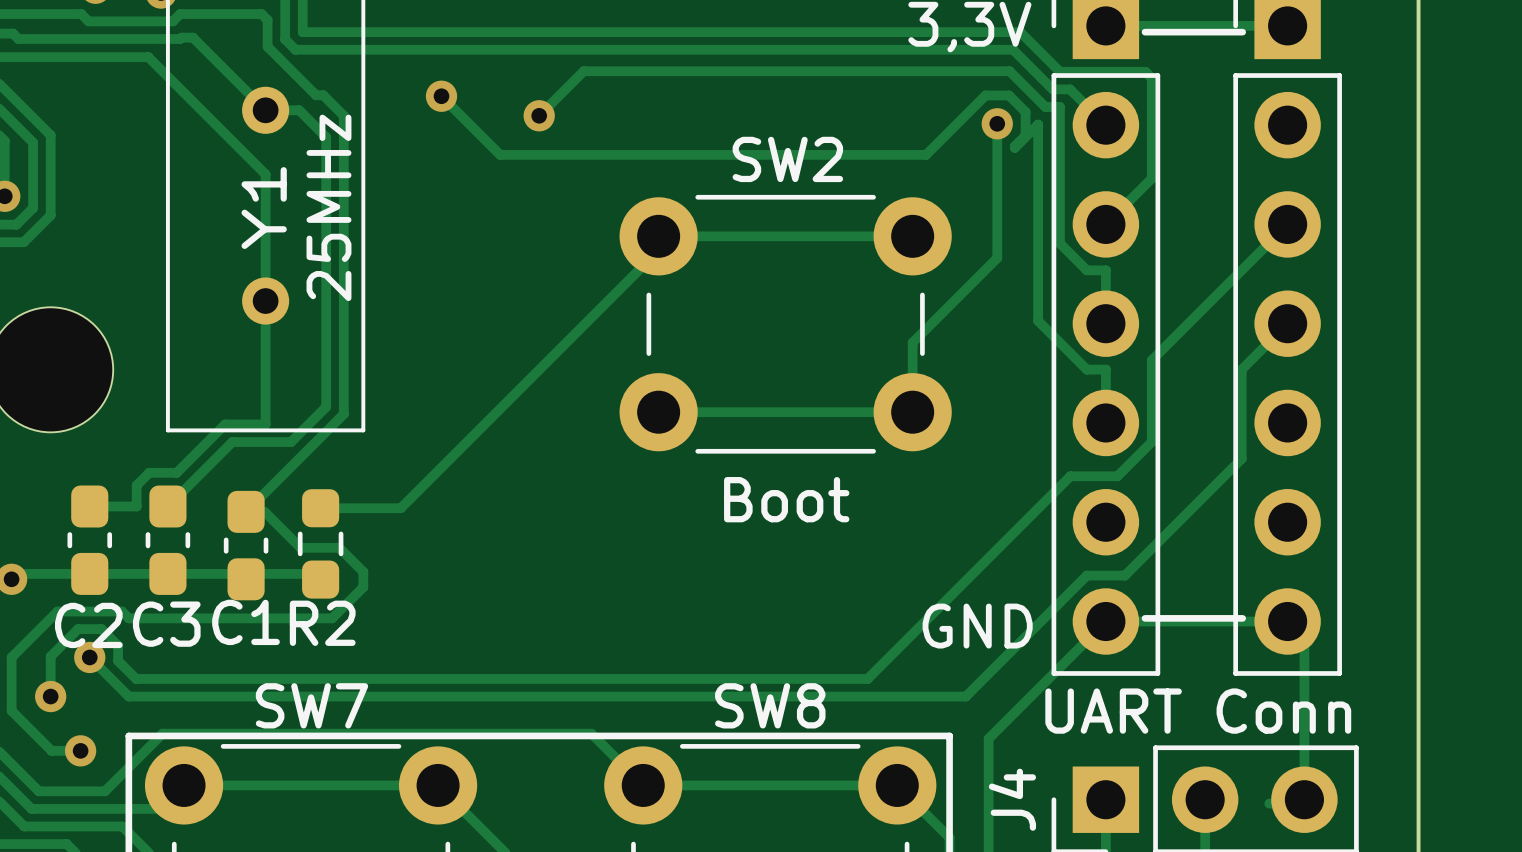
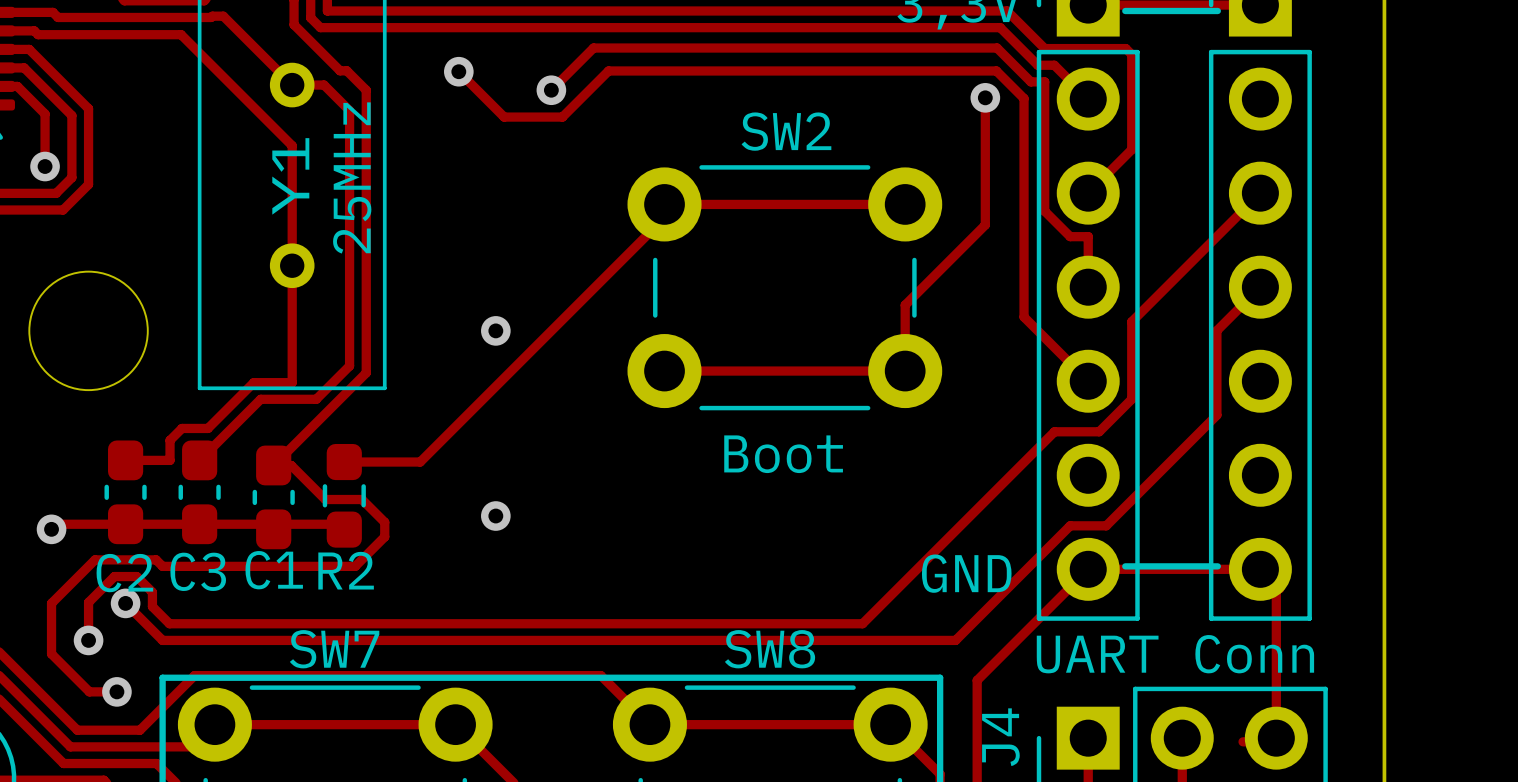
track: (985, 95) (926, 154) (500, 154) (489, 144) -> (974, 70) (608, 70) (562, 117) (504, 117)
track: (1025, 112) (1025, 135) (1014, 147) (1038, 124) -> (1012, 86) (1024, 98)
track: (1038, 320) (1086, 369) (1105, 369) (1105, 422) -> (1024, 284) (1024, 317) (1088, 381)
via: none -> (495, 330)
via: none -> (495, 516)

